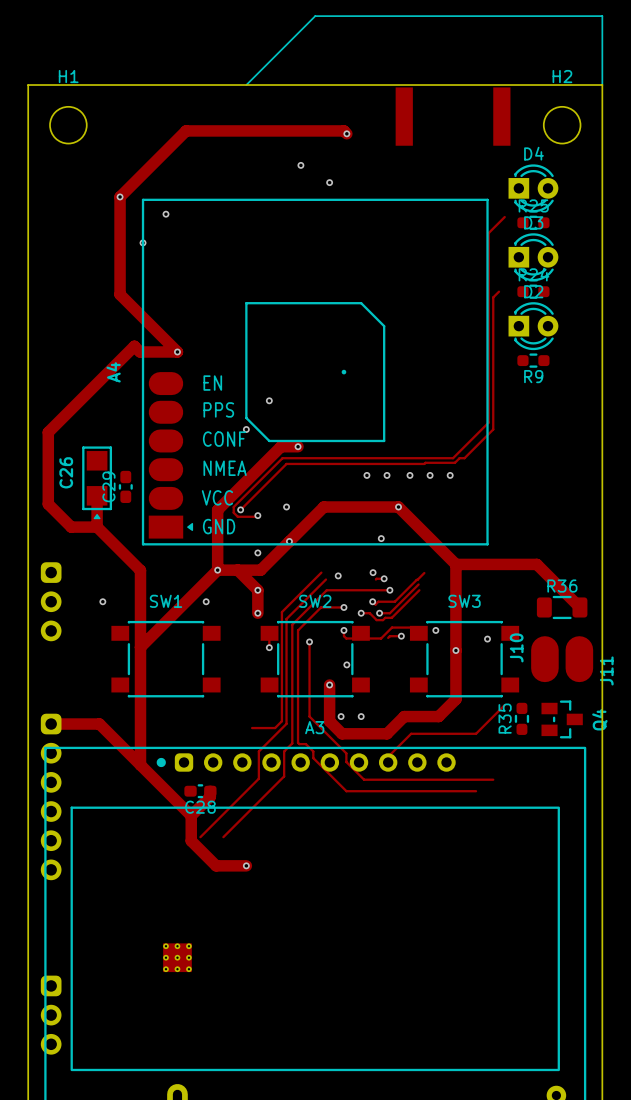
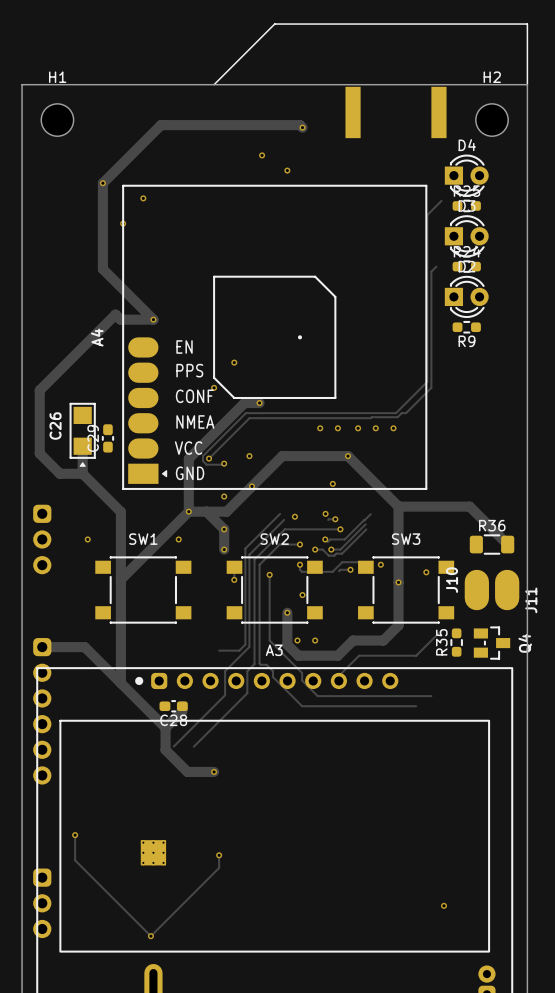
track: none -> (75, 835) (75, 860) (150, 936) (219, 867) (219, 855)
via: none -> (75, 835)
via: none -> (219, 855)
via: none -> (444, 905)
via: none -> (150, 936)

